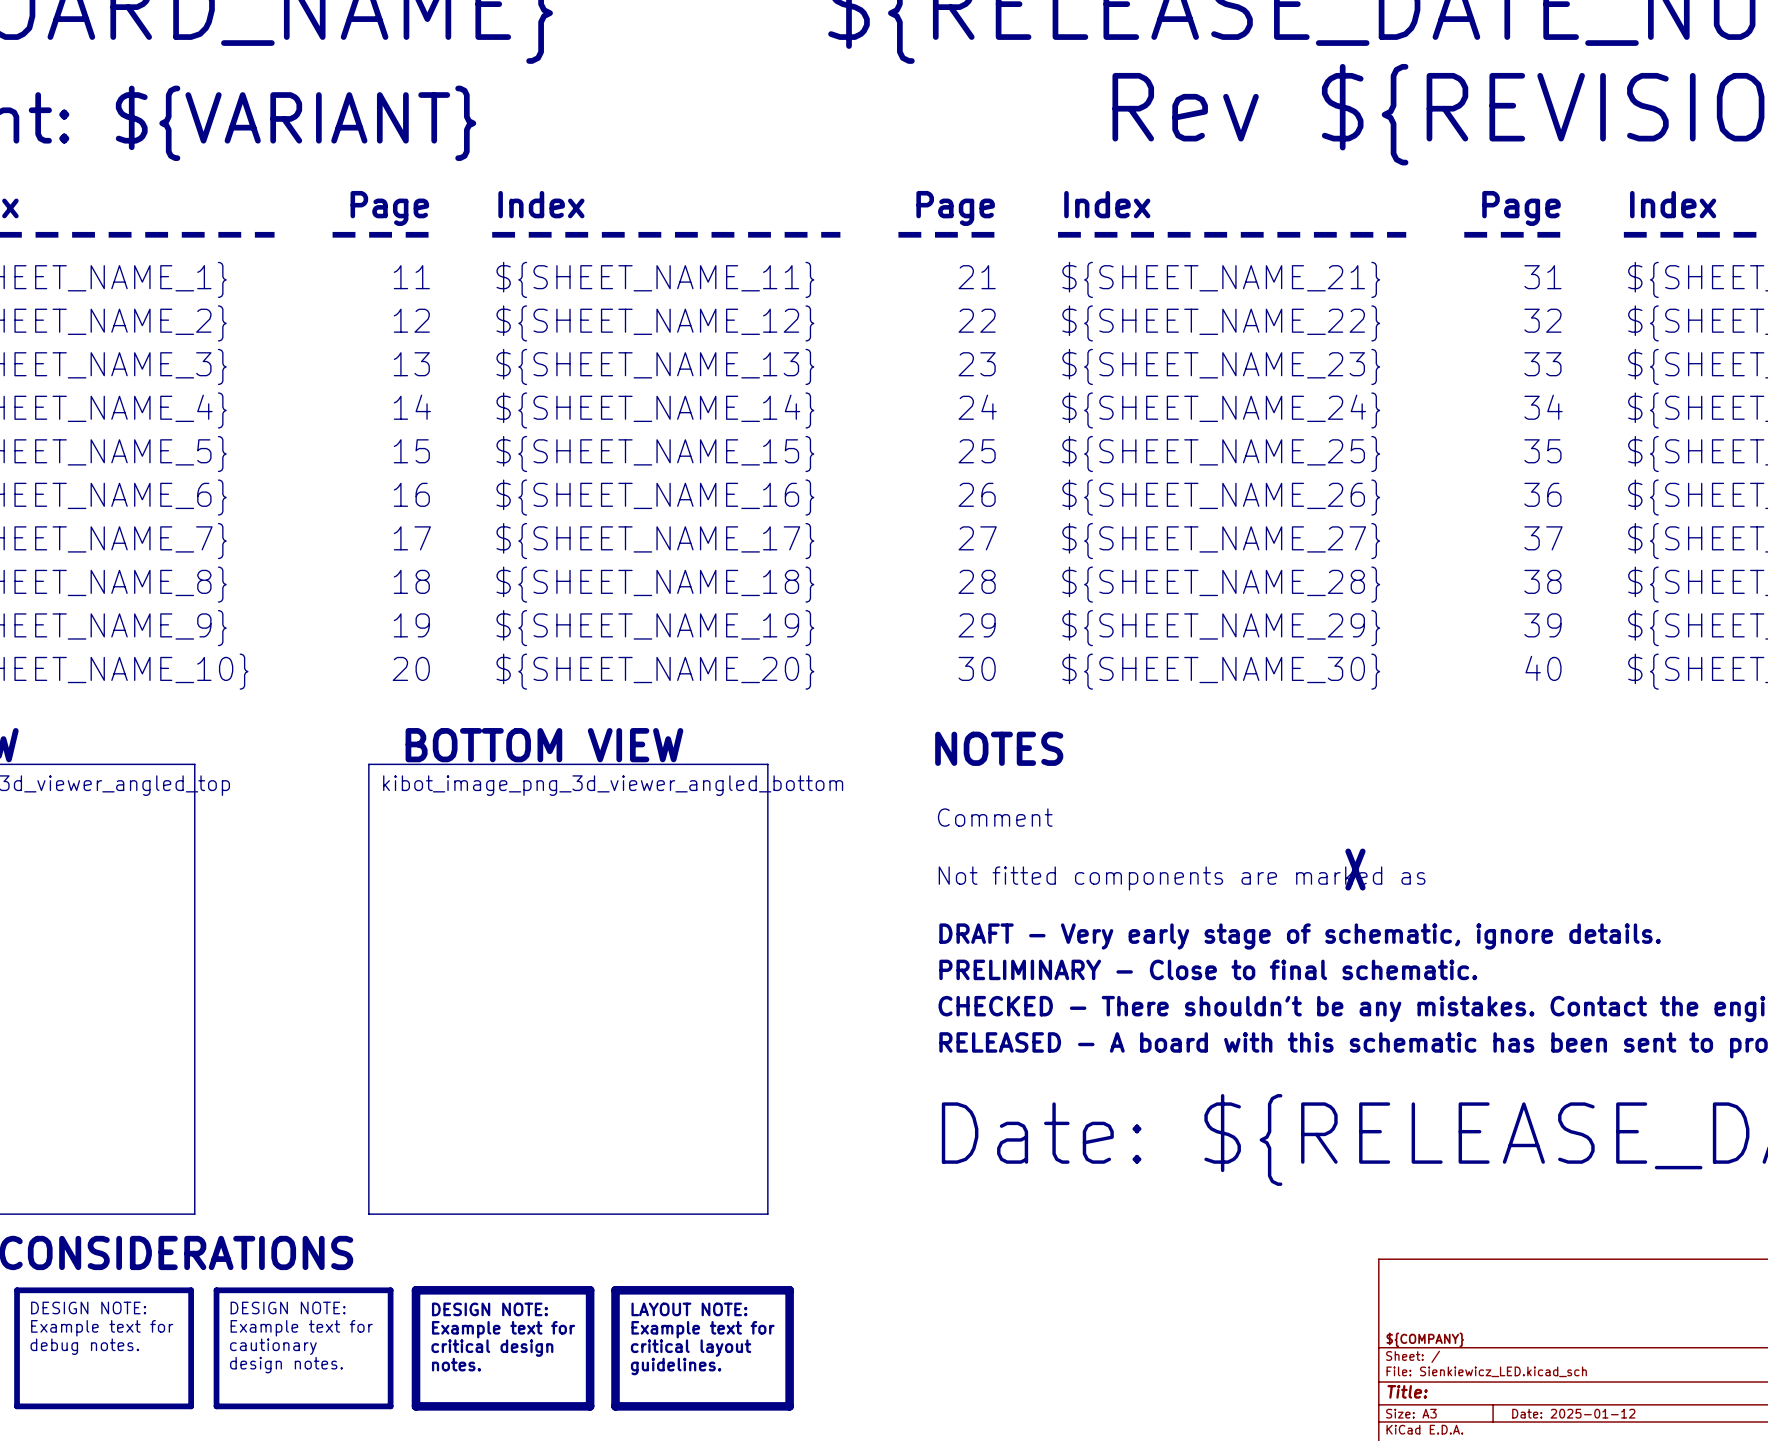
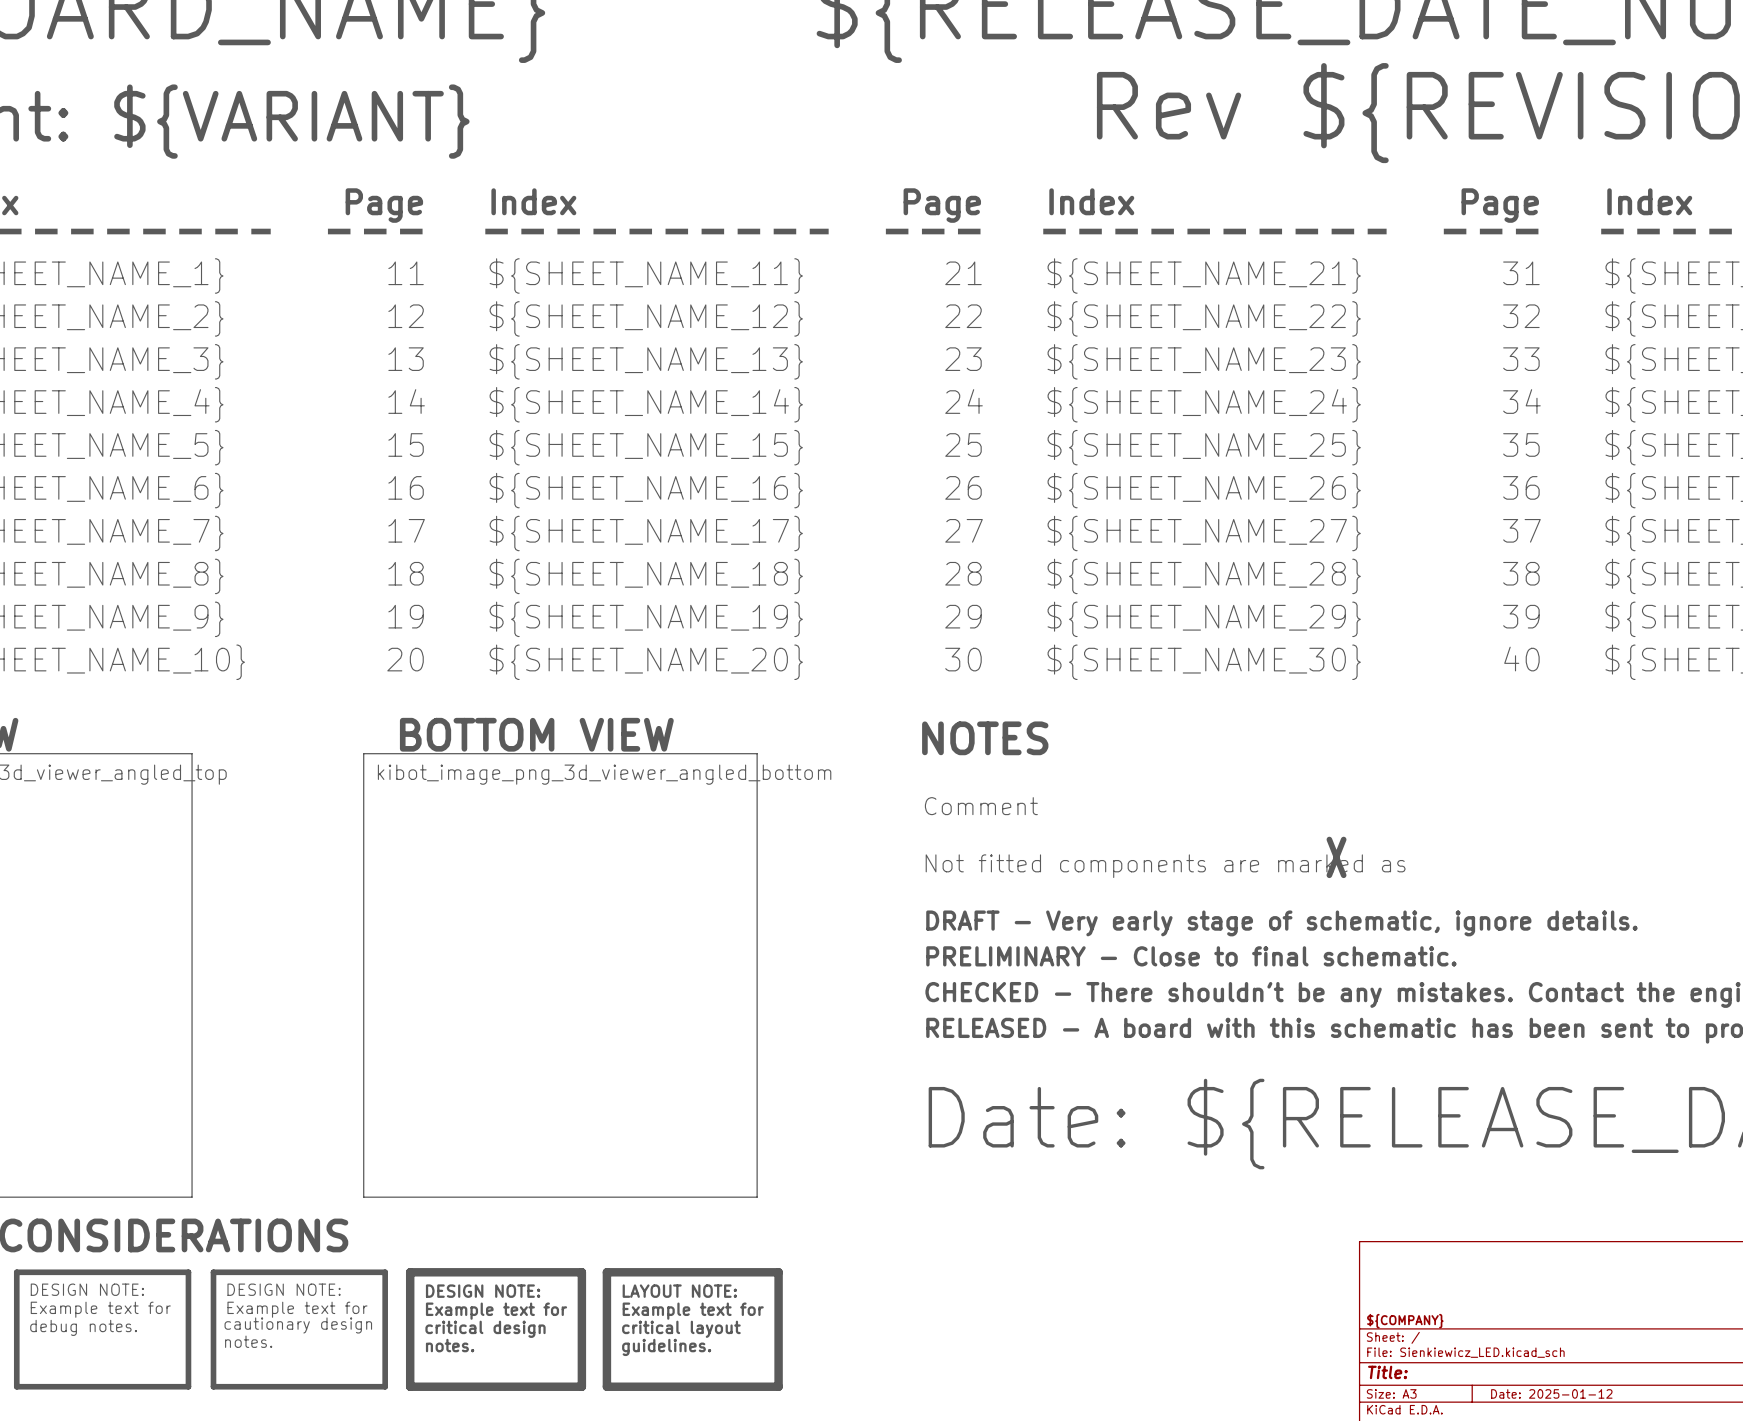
text: cautionary (273, 1346) -> cautionary design (298, 1325)
text: design notes. (286, 1365) -> notes. (248, 1341)

